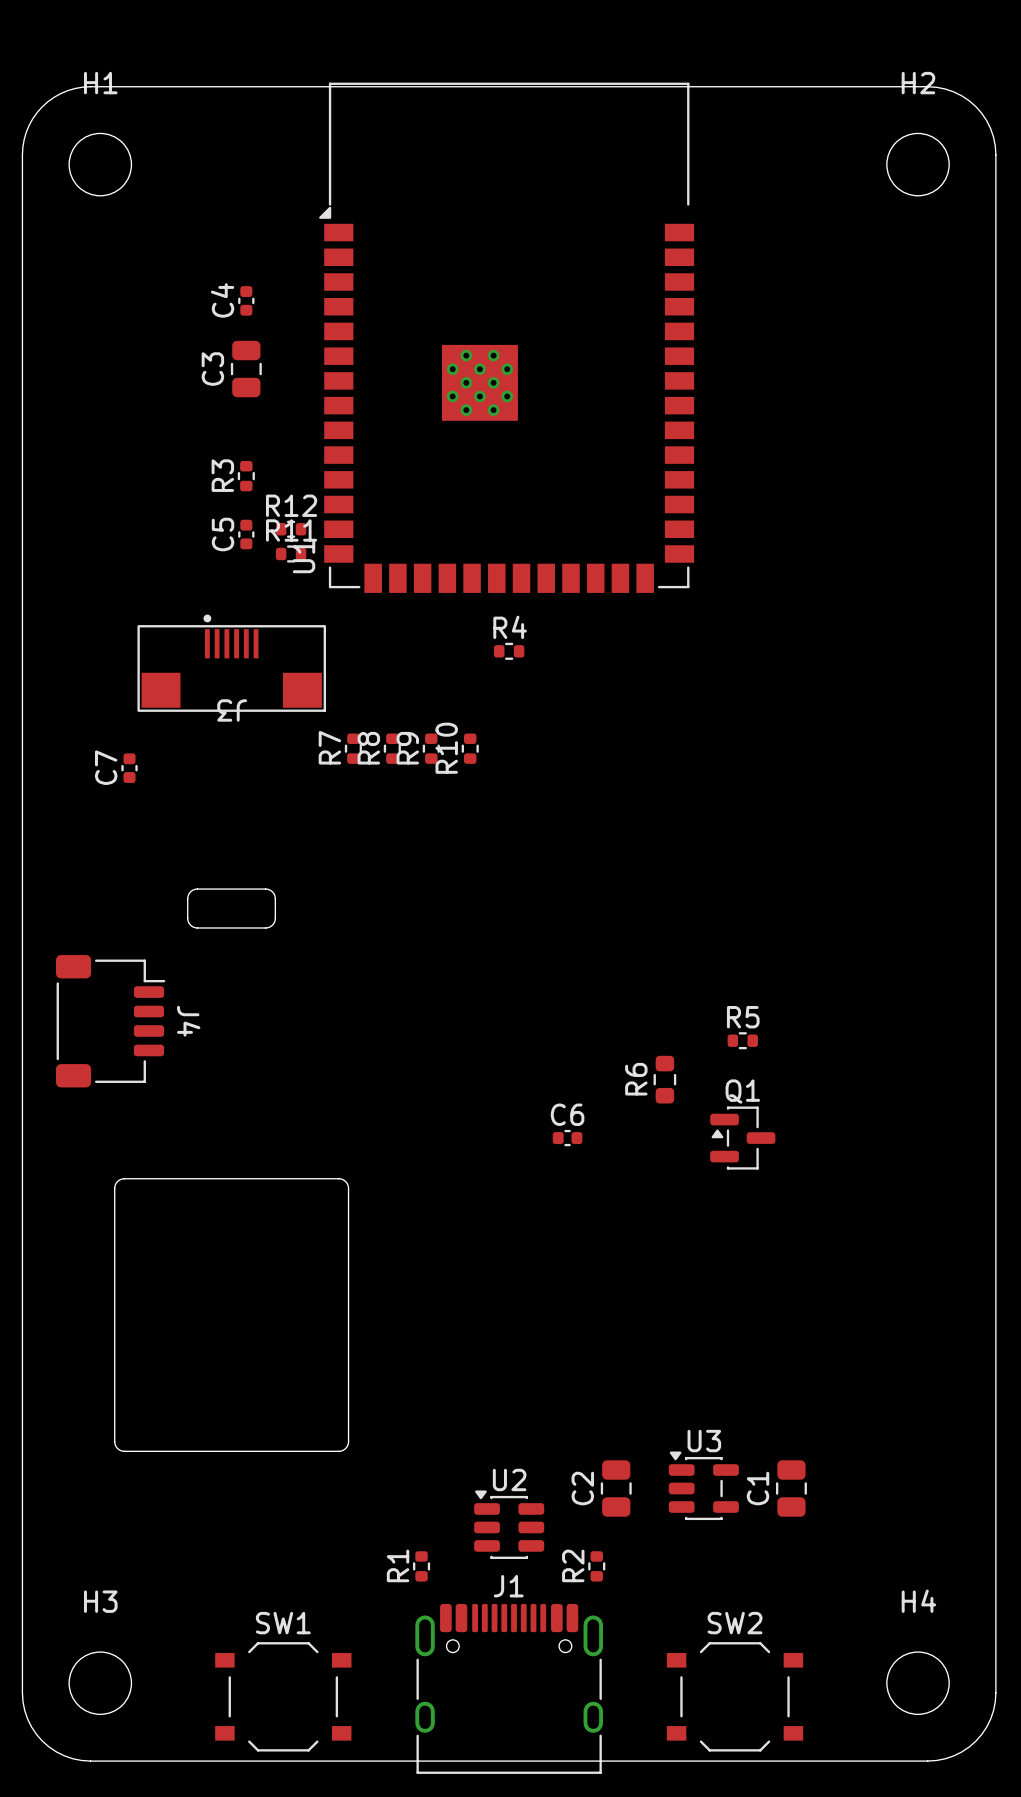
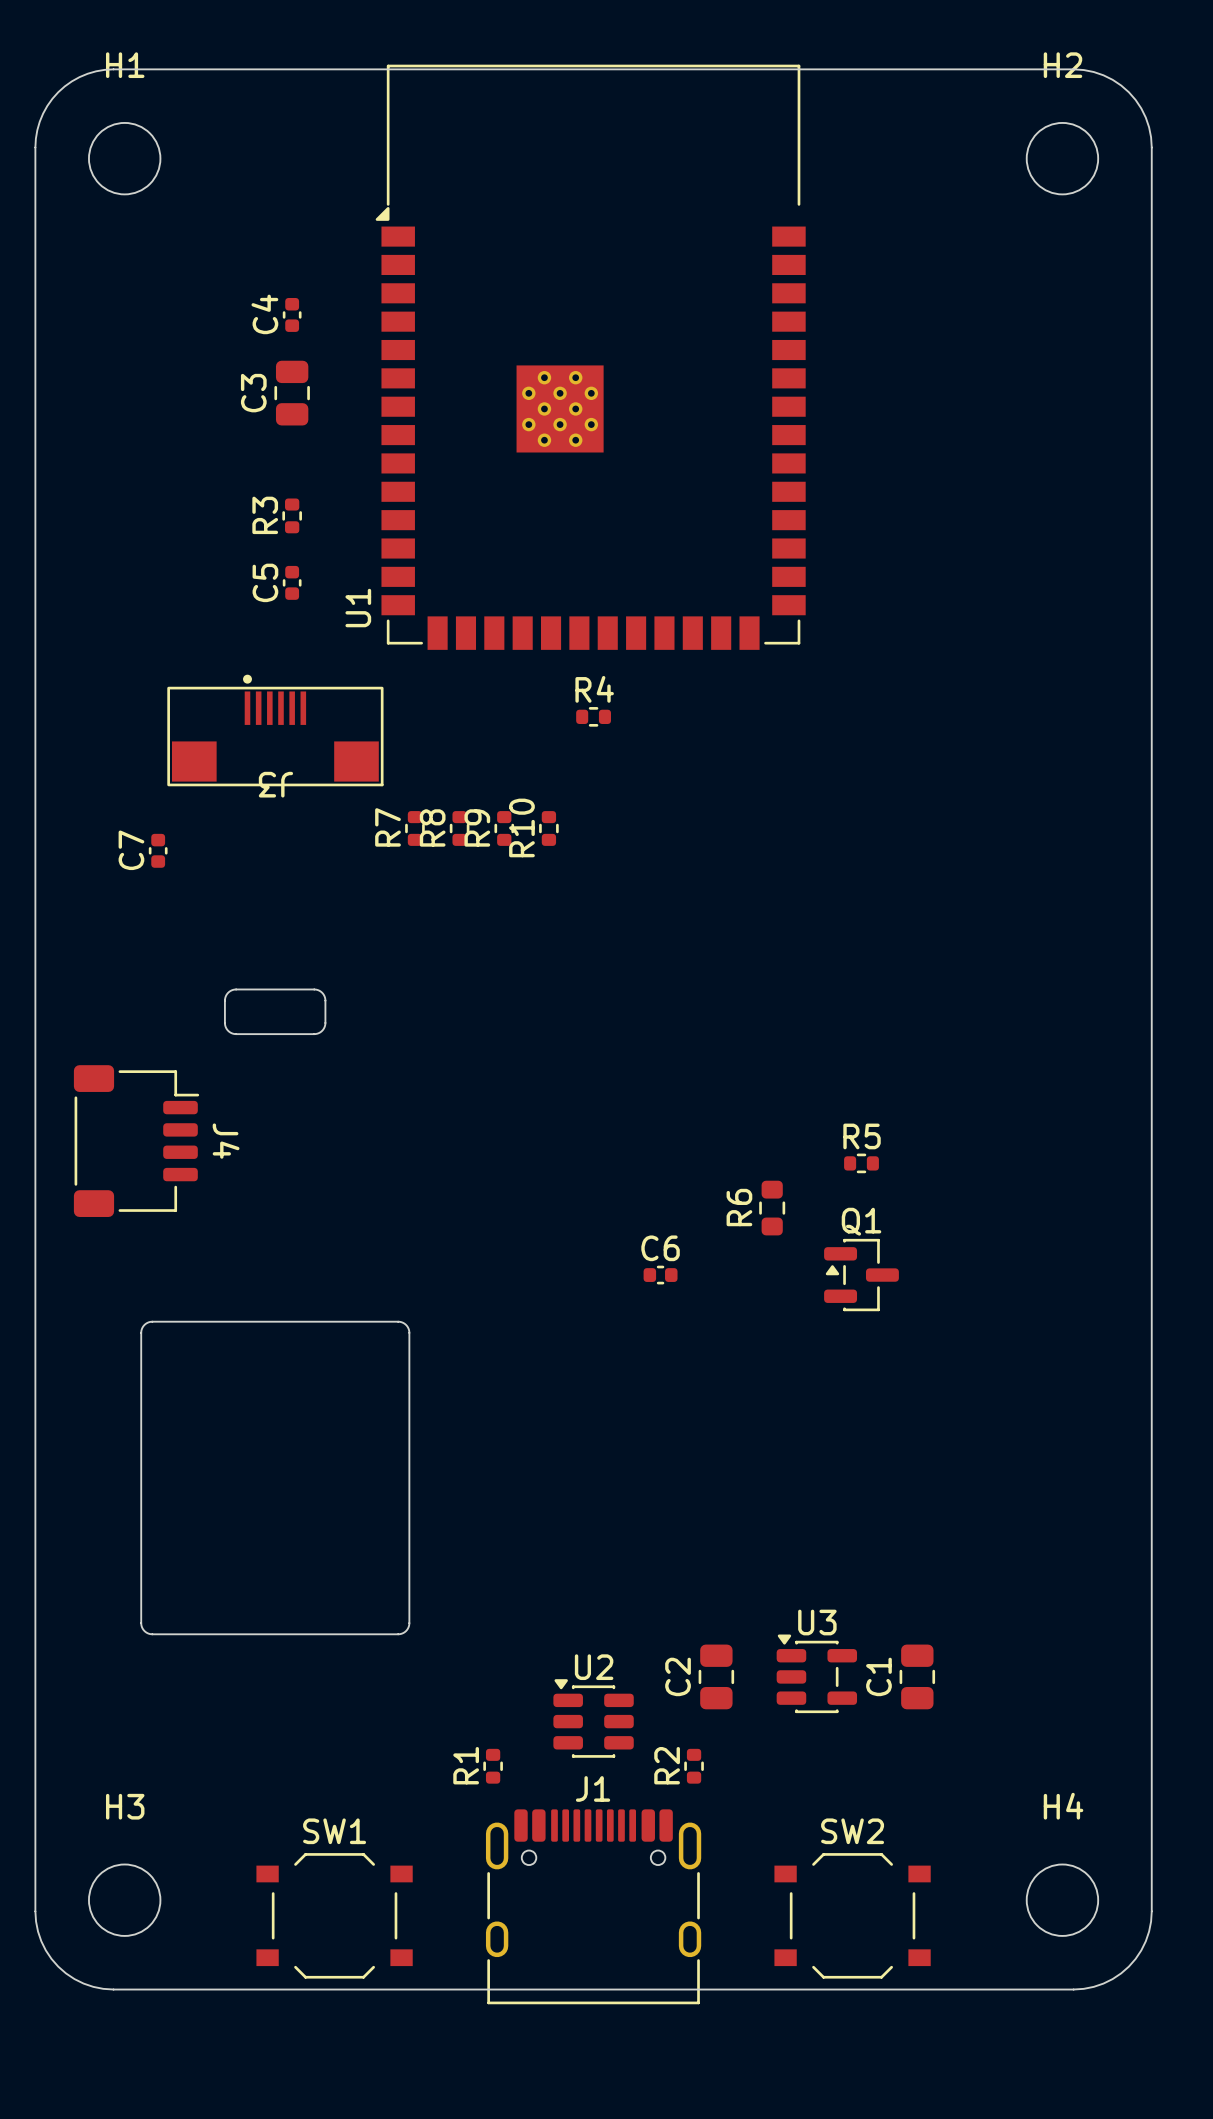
R12: (291, 529) -> none
R11: (291, 553) -> none

